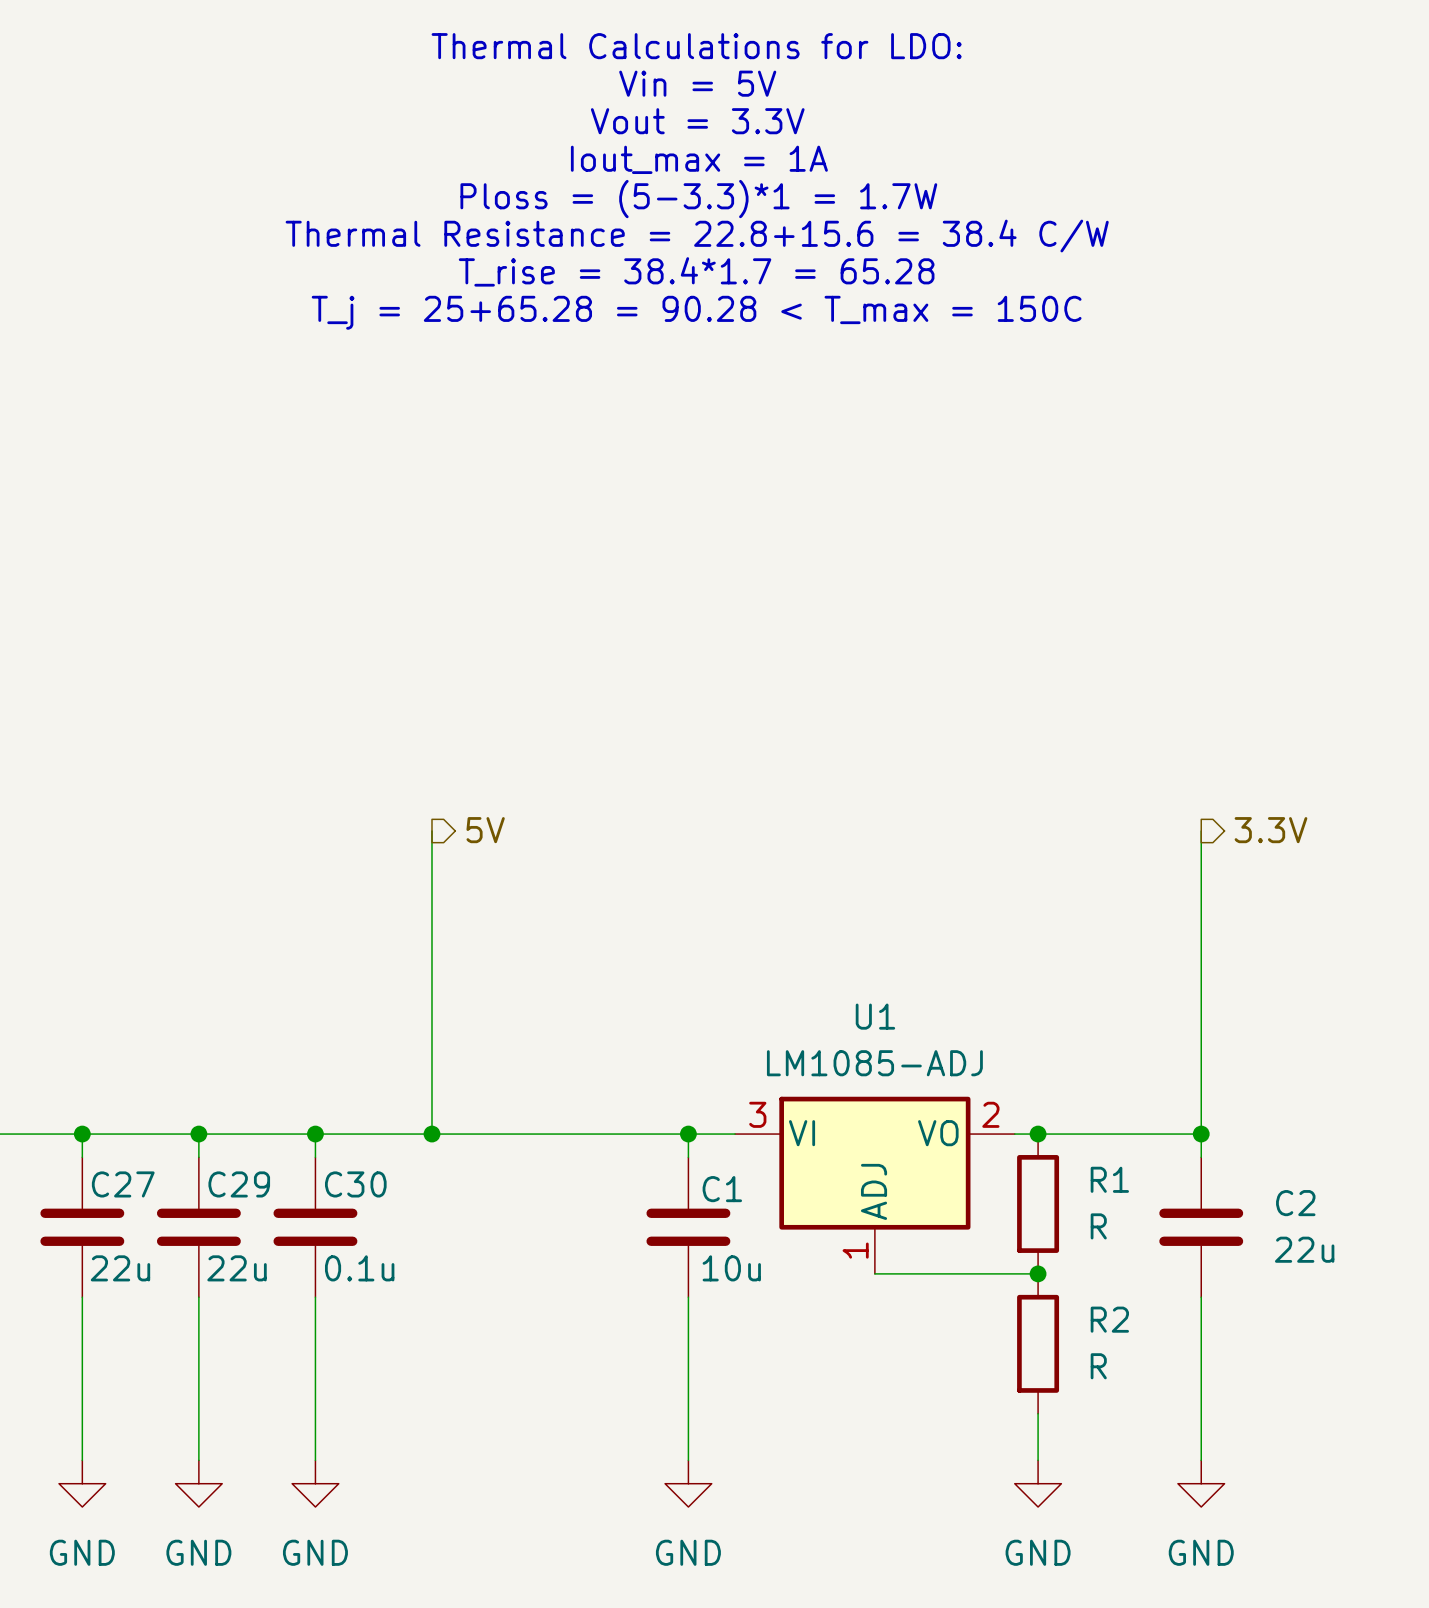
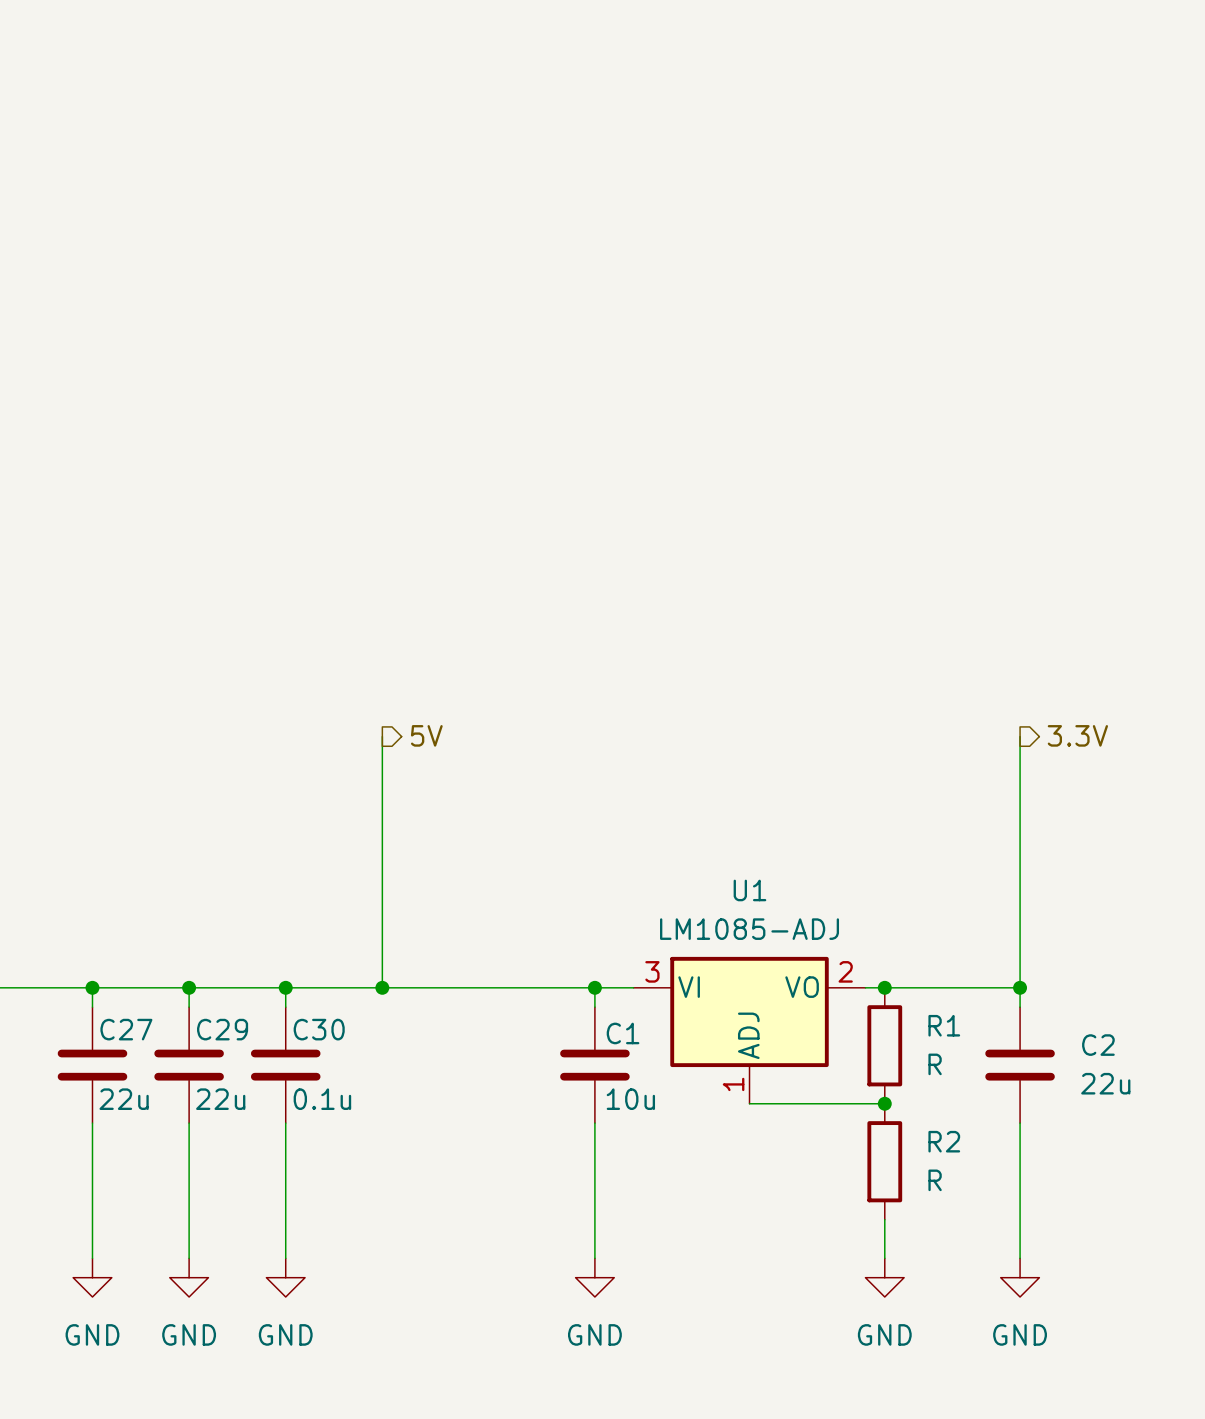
text: Thermal Calculations for LDO: (696, 46) -> none
text: Vin = 5V (697, 83) -> none
text: Vout = 3.3V (697, 121) -> none
text: Iout_max = 1A (699, 159) -> none
text: Ploss = (5-3.3)*1 = 1.7W (698, 199) -> none
text: Thermal Resistance = 22.8+15.6 = 38.4 C/W (697, 236) -> none
text: T_rise = 38.4*1.7 = 65.28 (696, 271) -> none
text: T_j = 25+65.28 = 90.28 < T_max = 150C (696, 312) -> none

